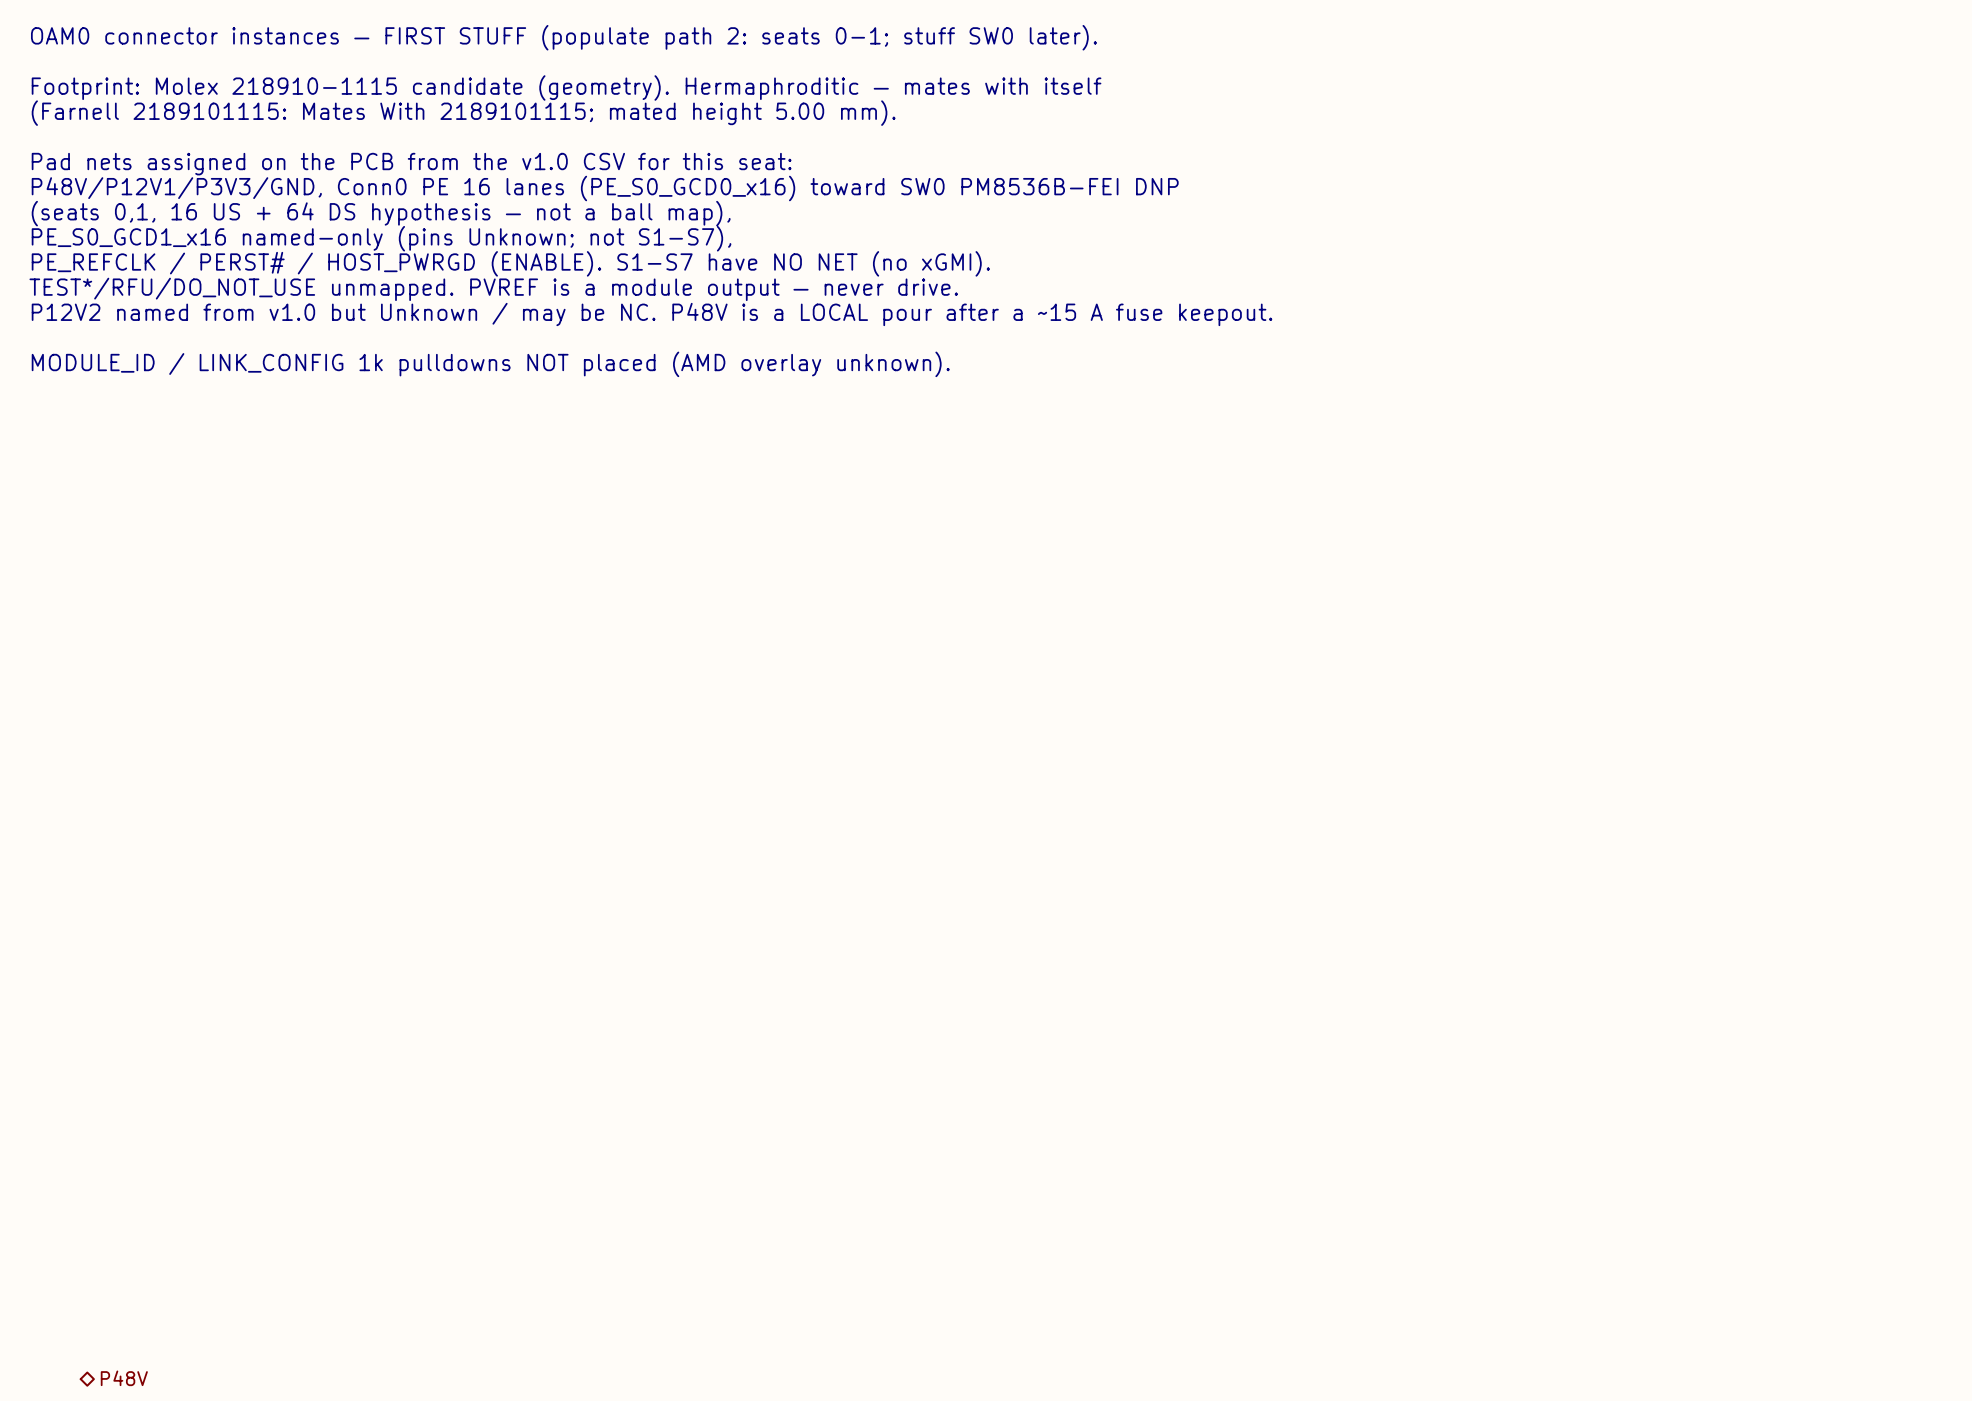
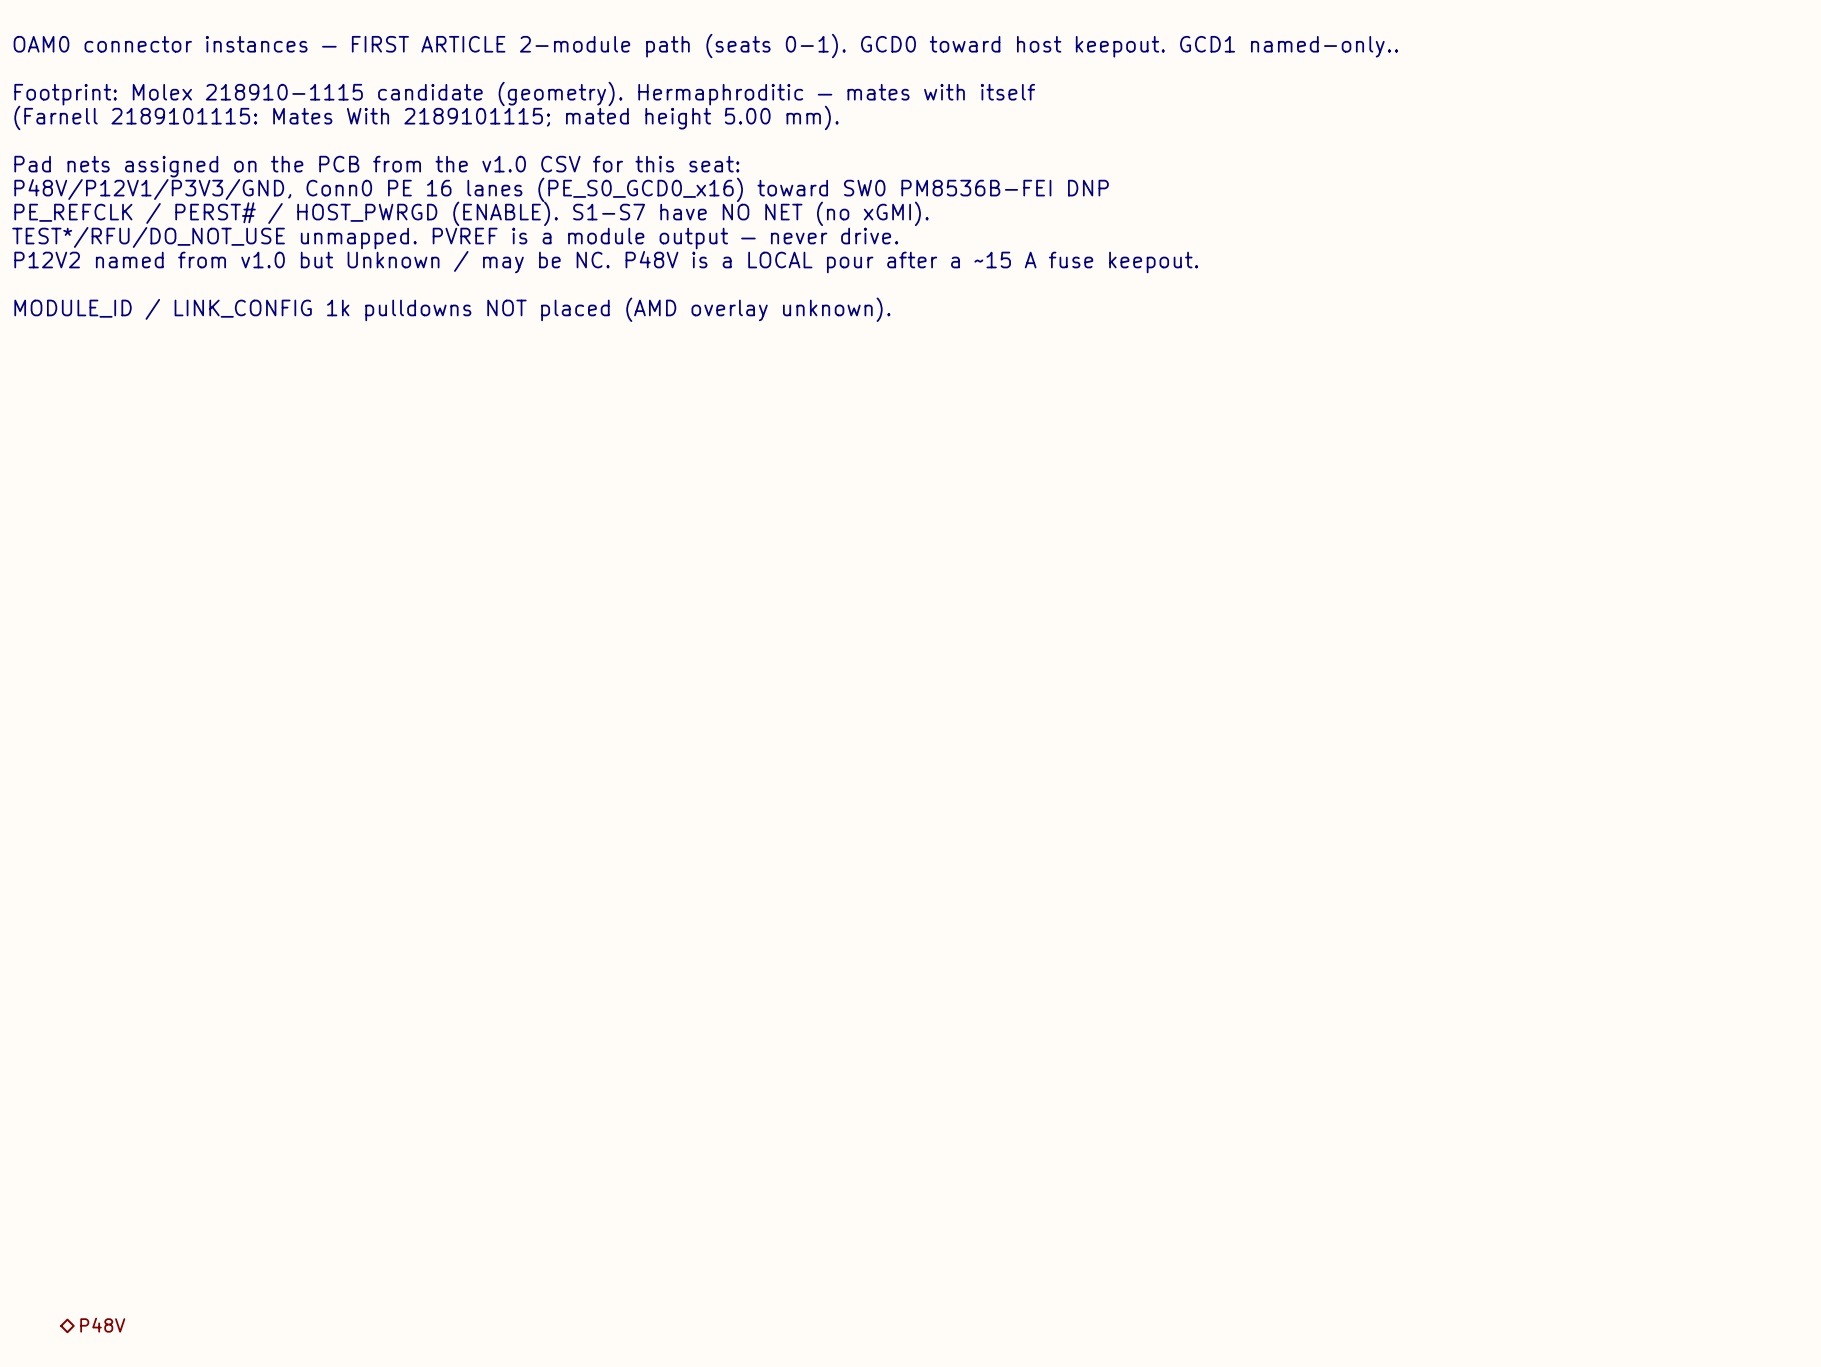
text: OAM0 connector instances — FIRST STUFF (populate path 2: seats 0-1; stuff SW0 later). (563, 37) -> OAM0 connector instances — FIRST ARTICLE 2-module path (seats 0-1). GCD0 toward host keepout. GCD1 named-only.. (705, 46)
text: (seats 0,1, 16 US + 64 DS hypothesis — not a ball map), (381, 213) -> PE_REFCLK / PERST# / HOST_PWRGD (ENABLE). S1-S7 have NO NET (no xGMI). (471, 213)
text: PE_S0_GCD1_x16 named-only (pins Unknown; not S1-S7), (381, 238) -> TEST*/RFU/DO_NOT_USE unmapped. PVREF is a module output — never drive. (455, 238)
text: PE_REFCLK / PERST# / HOST_PWRGD (ENABLE). S1-S7 have NO NET (no xGMI). (510, 263) -> P12V2 named from v1.0 but Unknown / may be NC. P48V is a LOCAL pour after a ~15 A fuse keepout. (606, 262)
text: TEST*/RFU/DO_NOT_USE unmapped. PVREF is a module output — never drive. (493, 289) -> none
text: P12V2 named from v1.0 but Unknown / may be NC. P48V is a LOCAL pour after a ~15 A fuse keepout. (652, 314) -> MODULE_ID / LINK_CONFIG 1k pulldowns NOT placed (AMD overlay unknown). (452, 309)
text: MODULE_ID / LINK_CONFIG 1k pulldowns NOT placed (AMD overlay unknown). (490, 364) -> none

